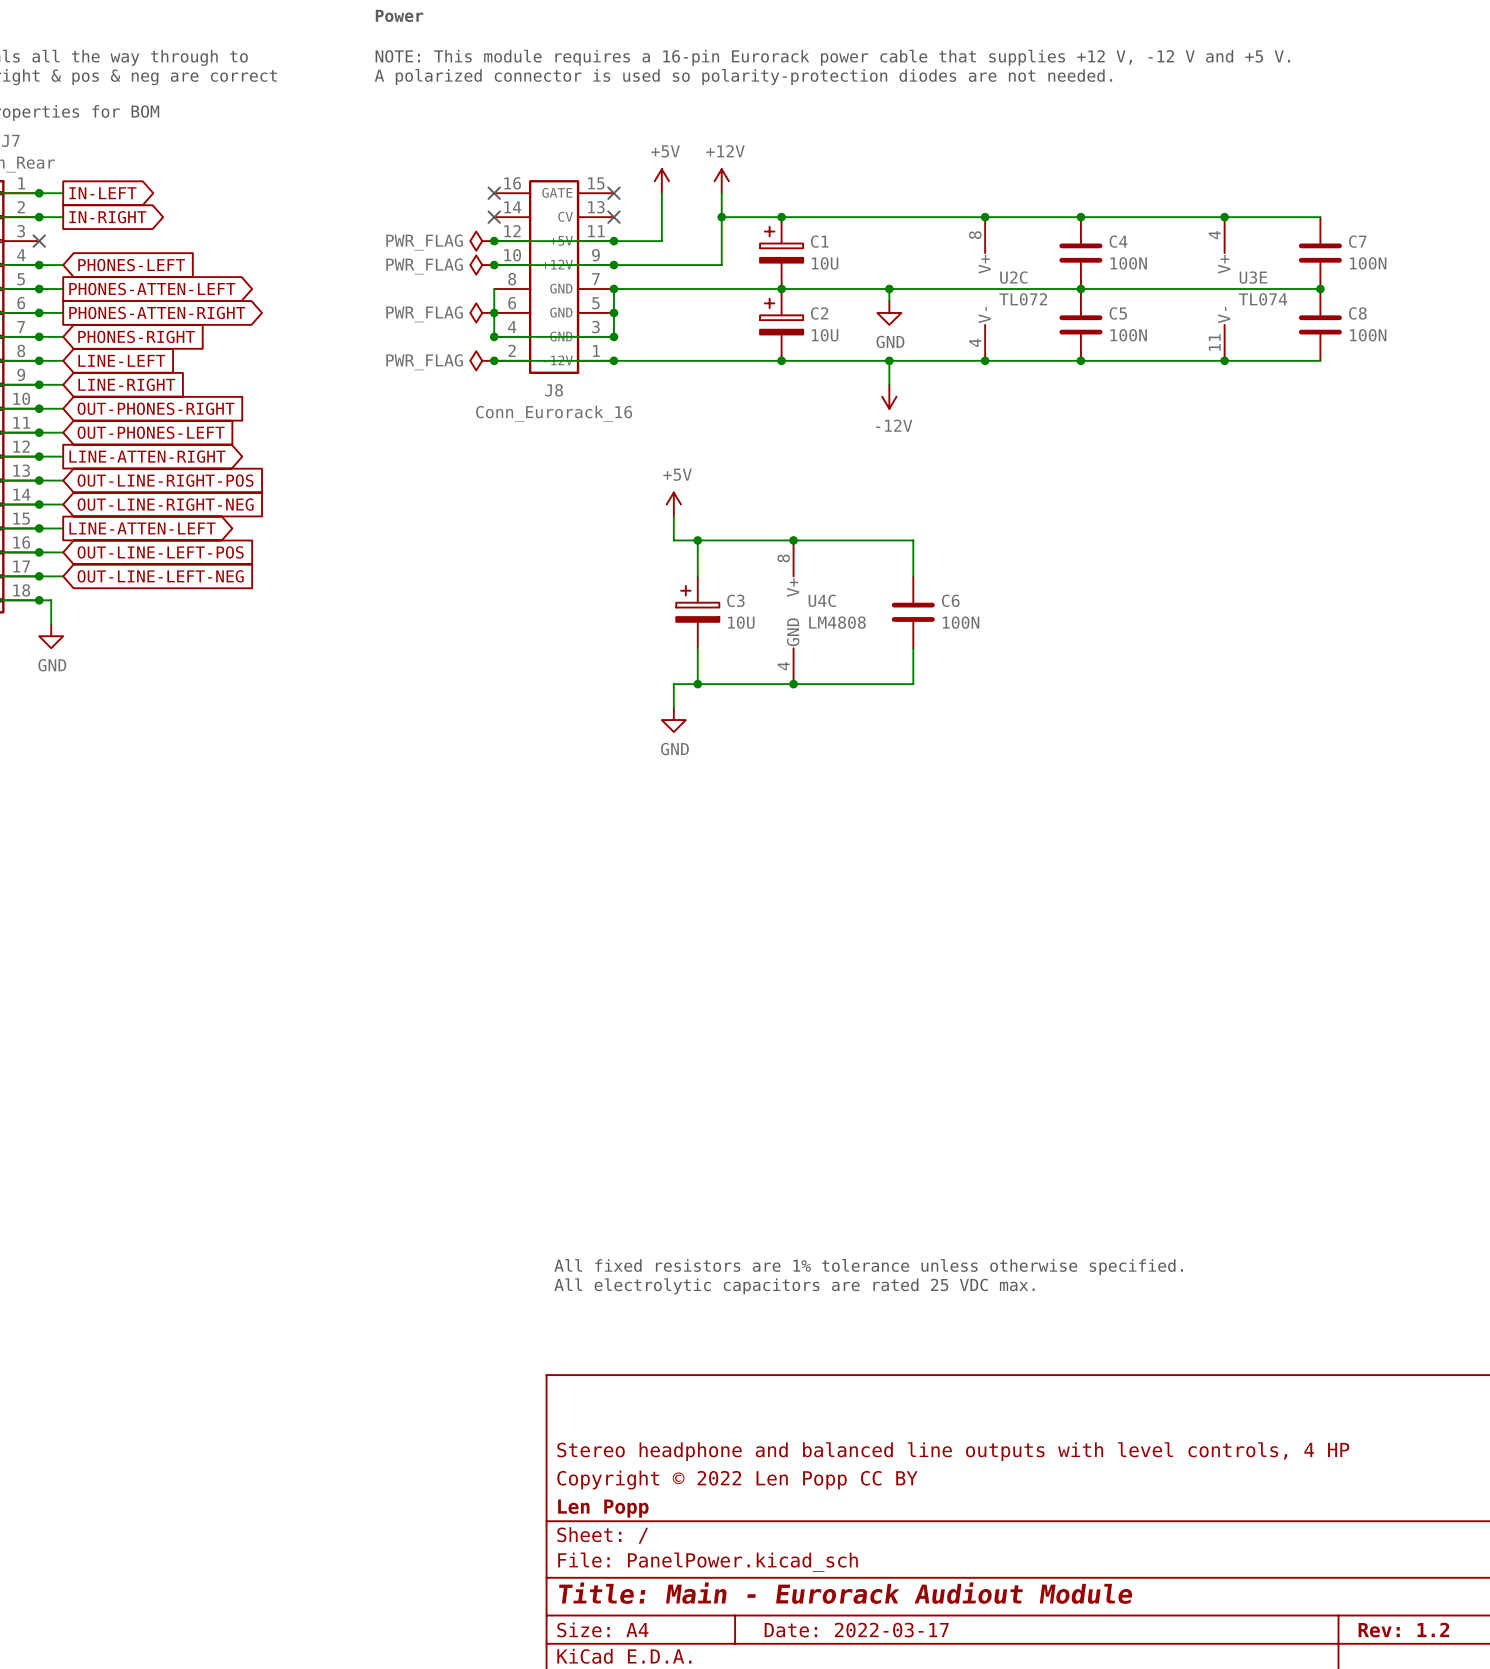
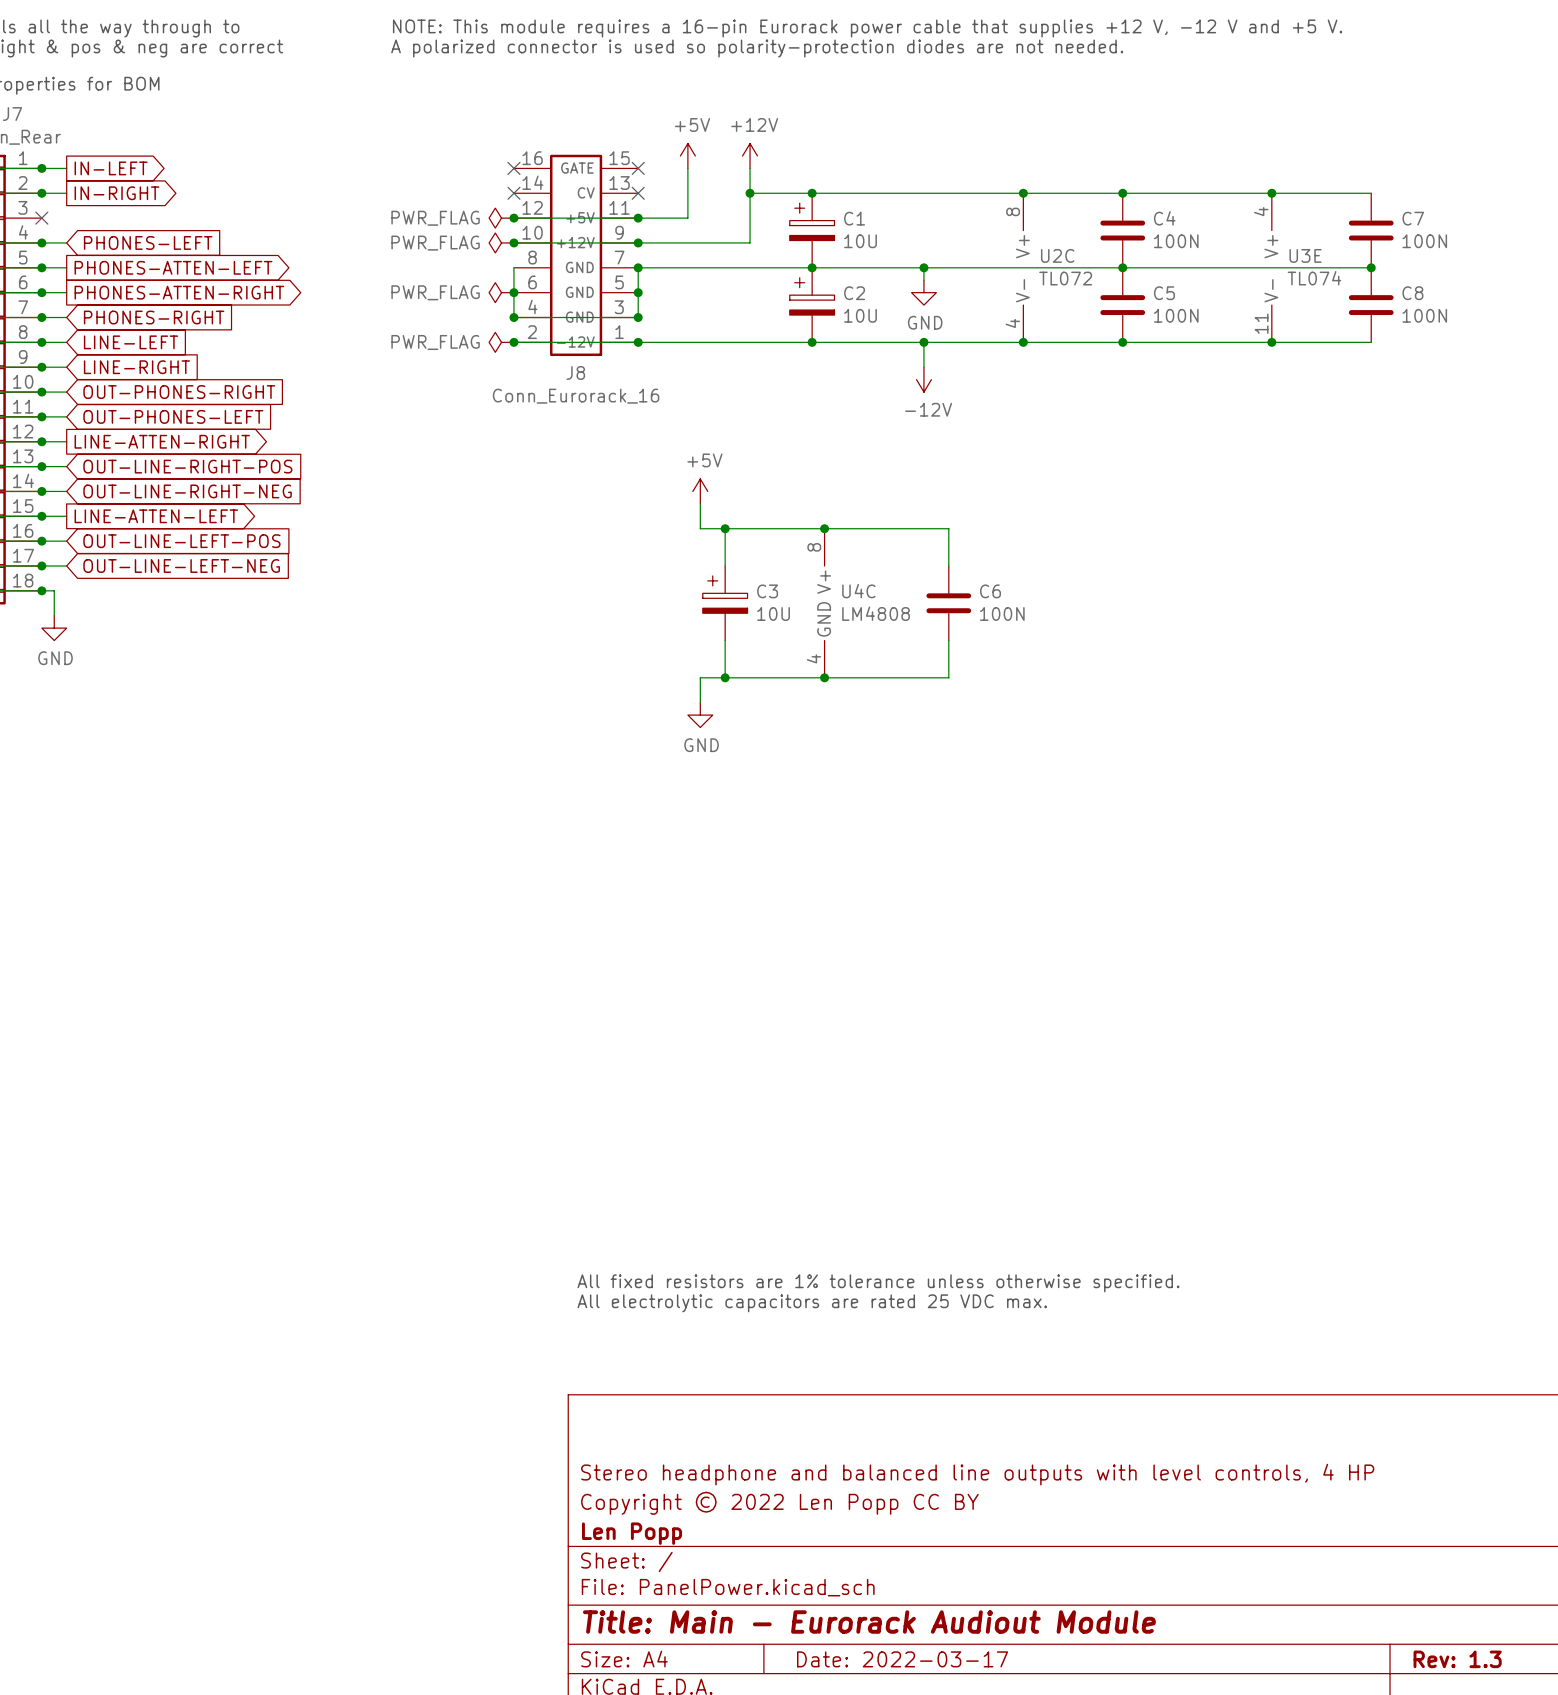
title block: Rev: 1.2 (1403, 1630) -> Rev: 1.3 (1457, 1659)

